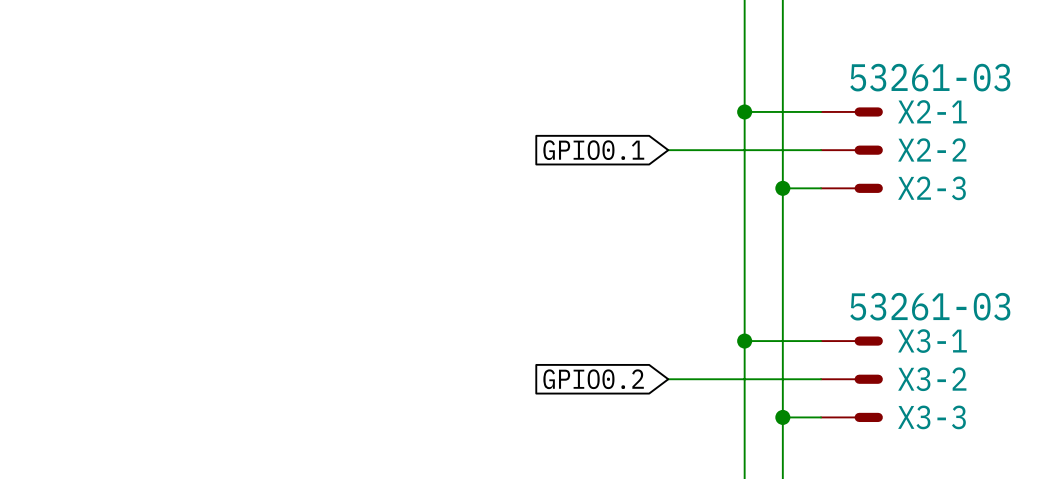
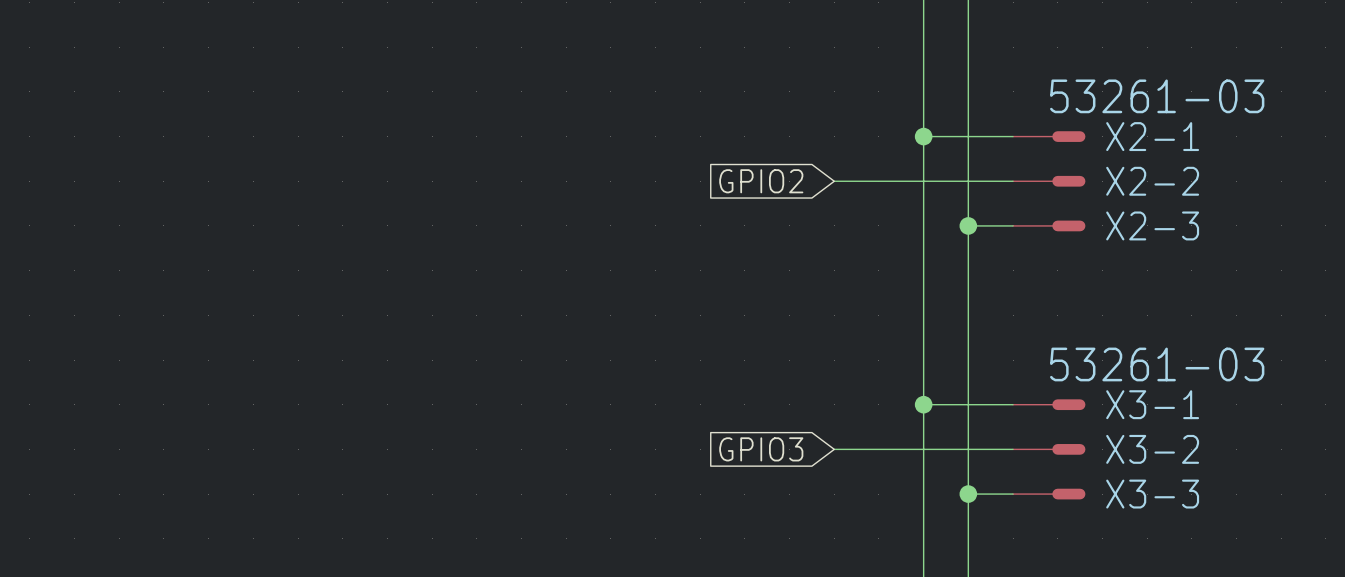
global label: GPIO0.1 (593, 150) -> GPIO2 (761, 181)
global label: GPIO0.2 (593, 379) -> GPIO3 (761, 449)

